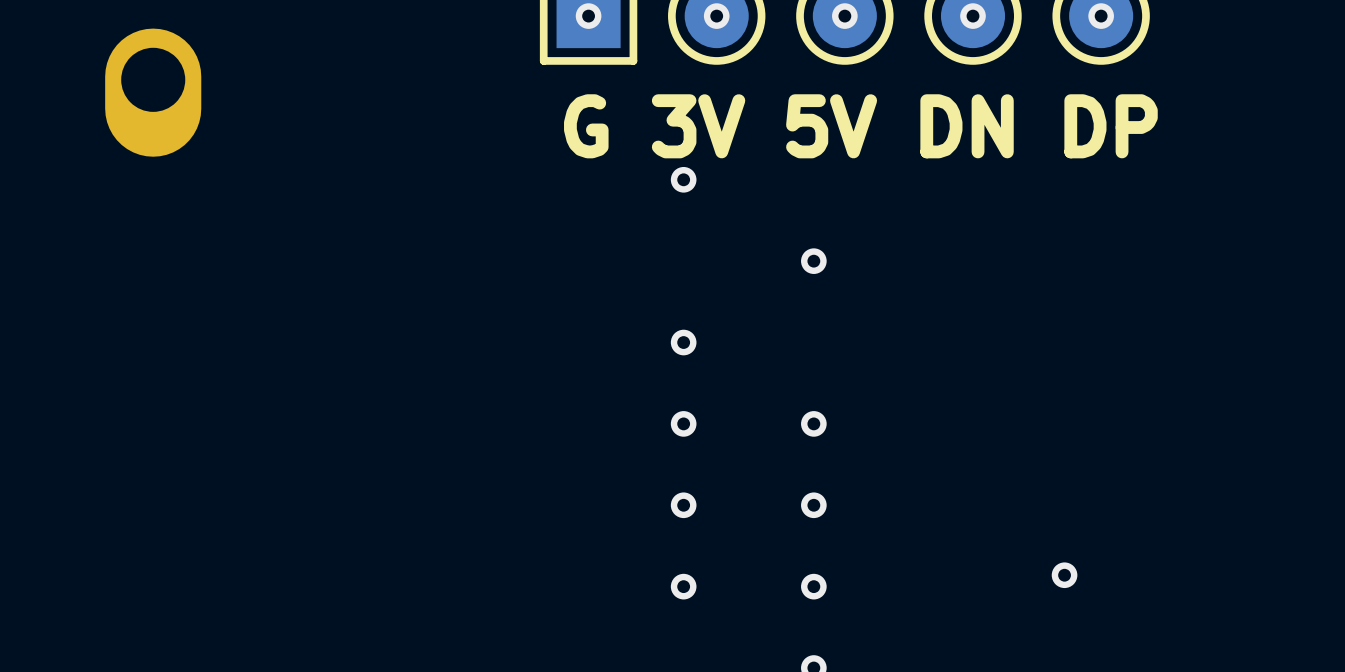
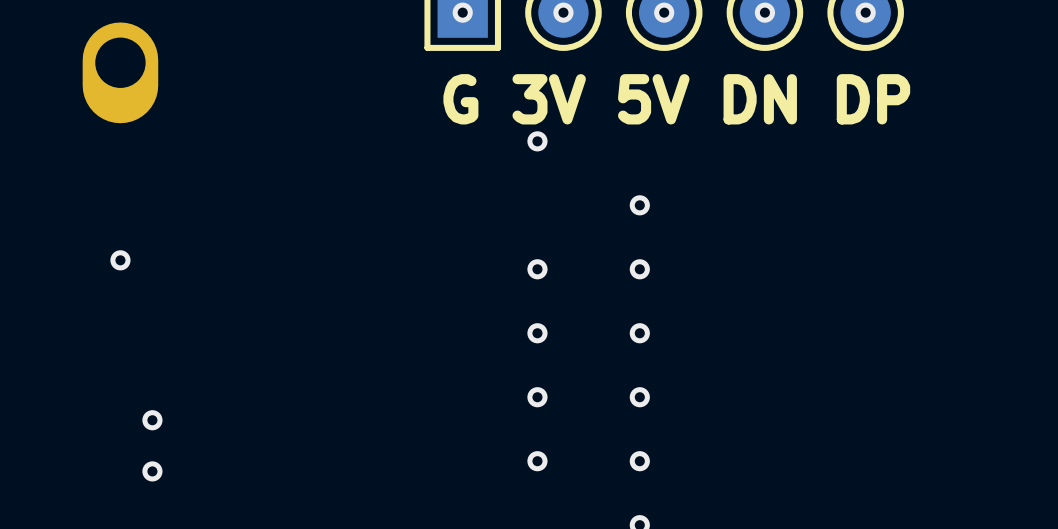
via: none -> (120, 260)
via: none -> (152, 420)
via position: (1064, 575) -> (639, 269)
via: none -> (152, 471)

